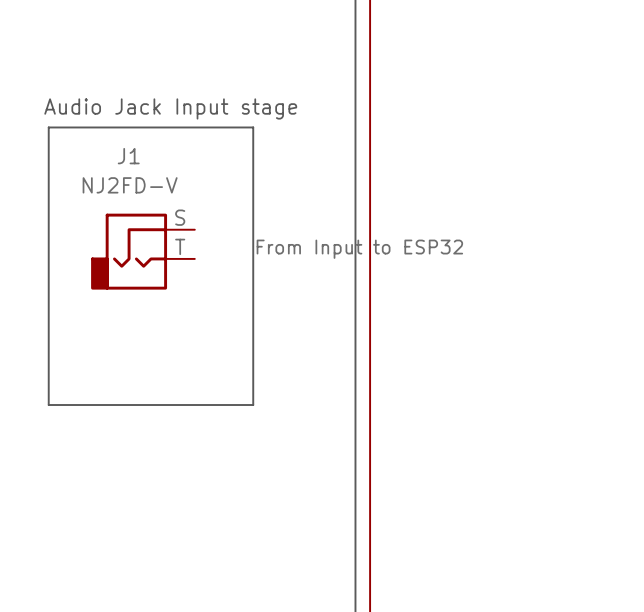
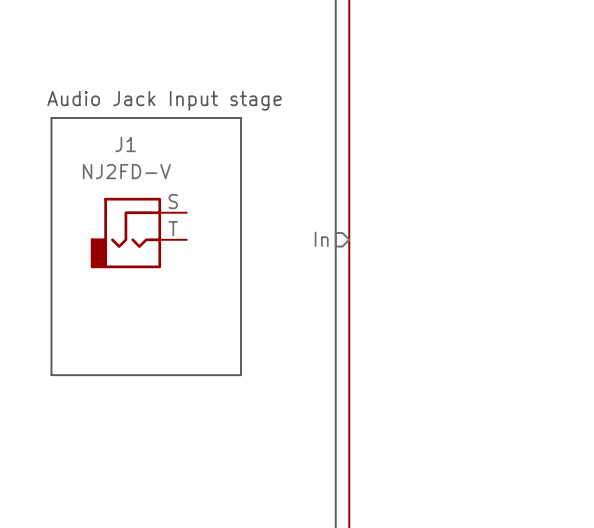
label: From Input to ESP32 (359, 249) -> none
hierarchical label: none -> In (321, 239)

